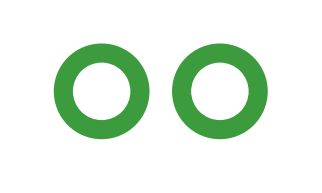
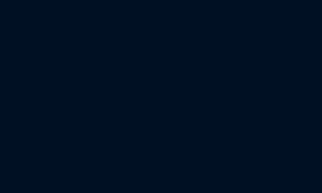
part: (101, 91) -> none
part: (219, 91) -> none

